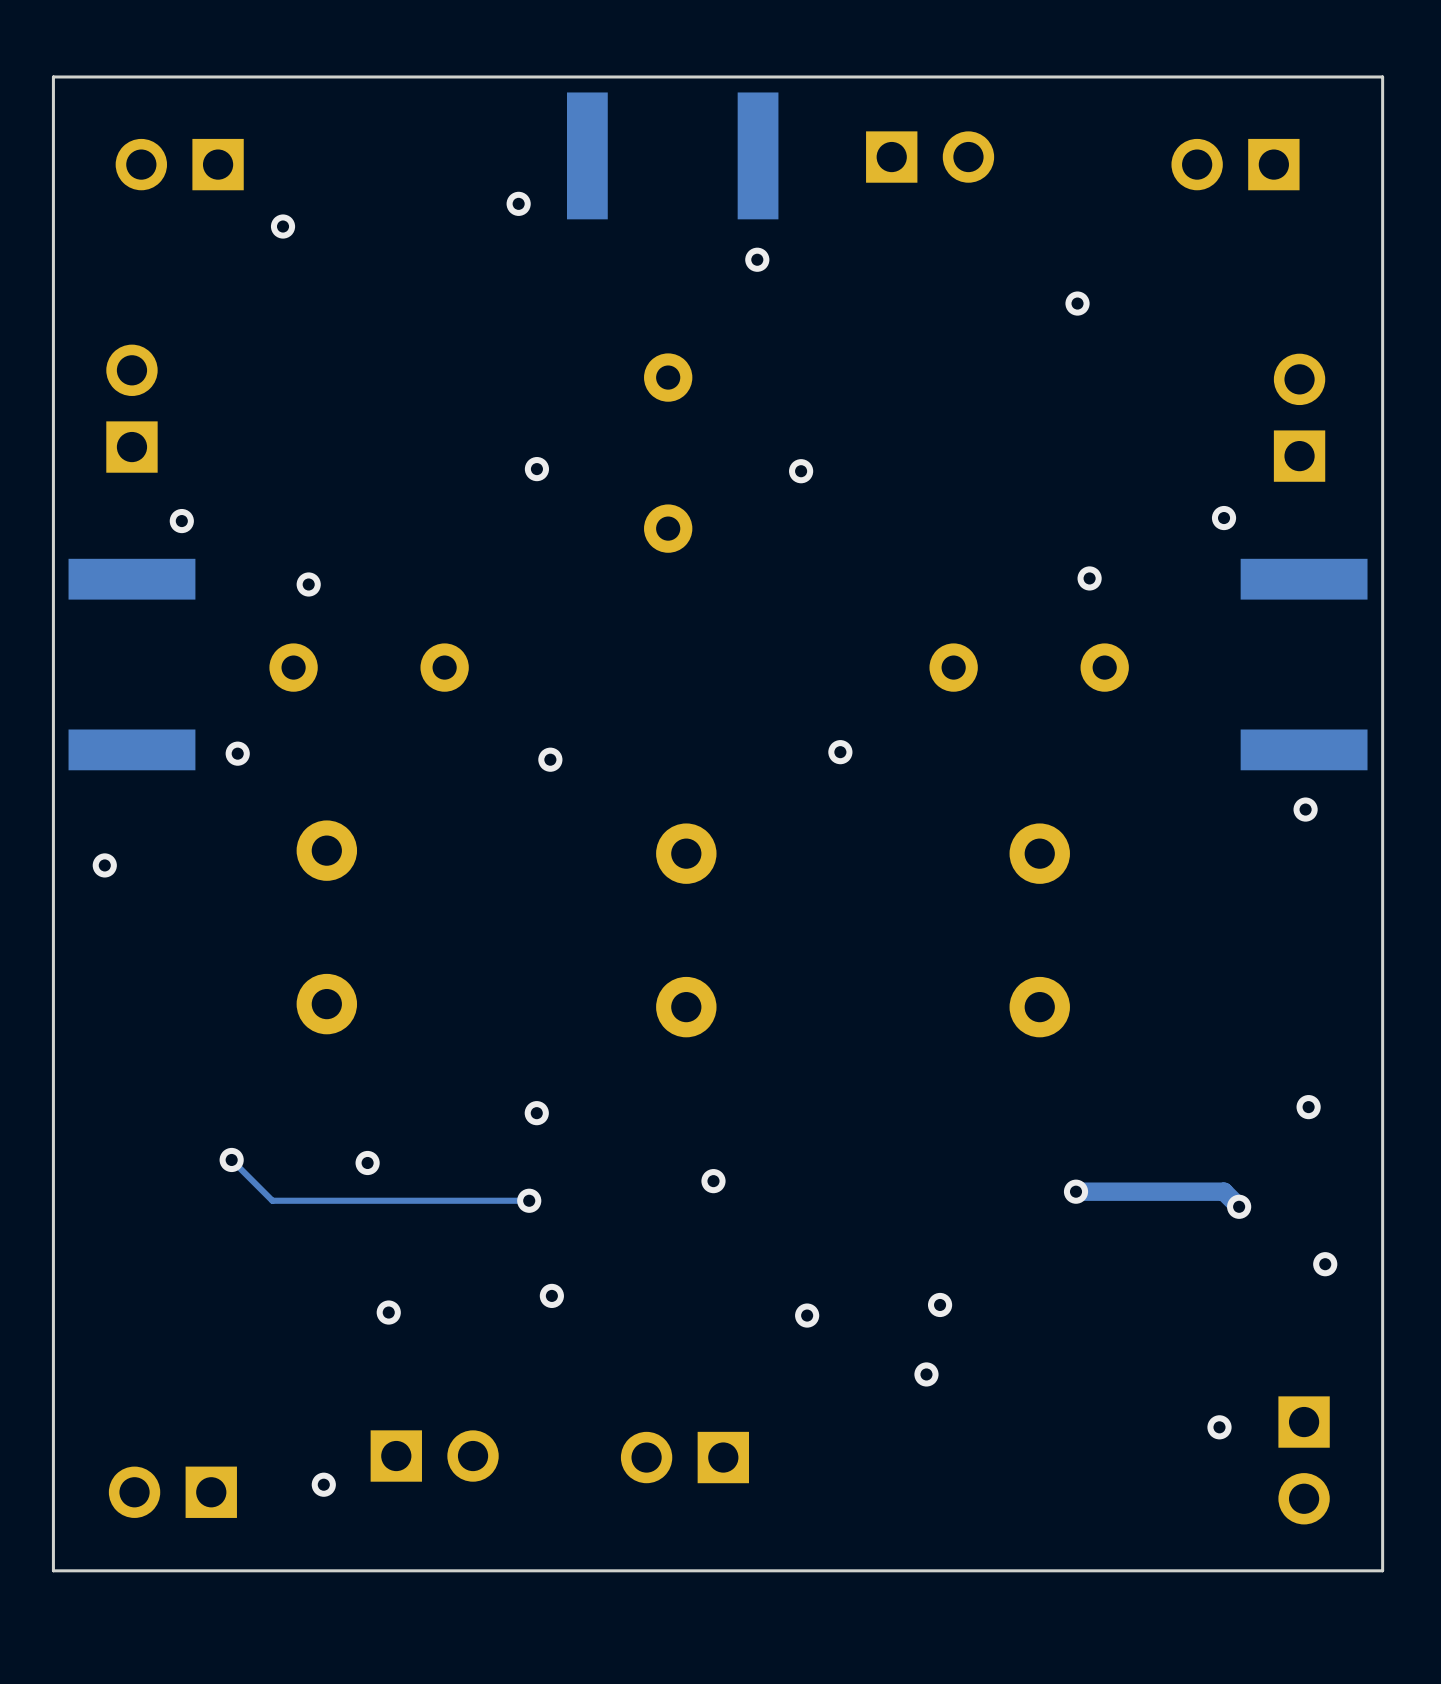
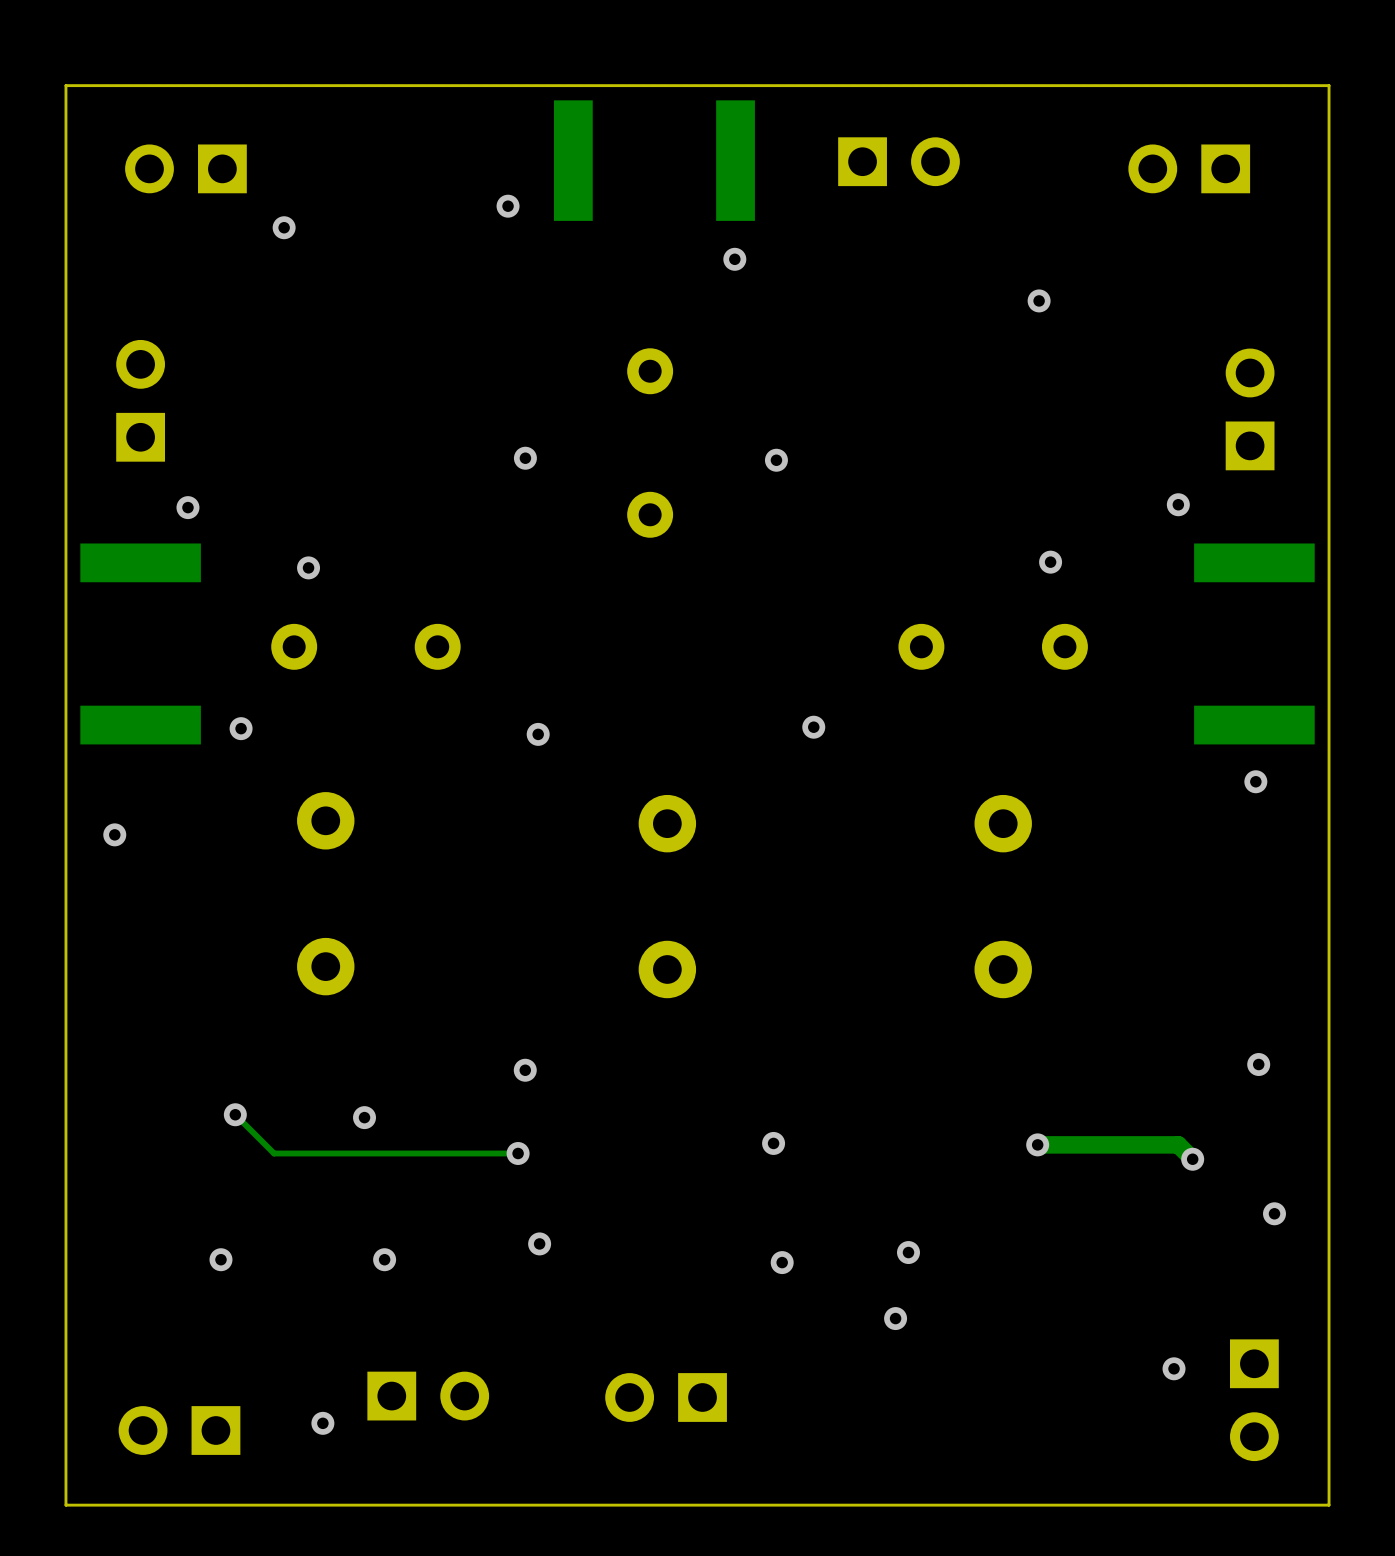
via position: (713, 1181) -> (773, 1143)
via: none -> (220, 1259)

